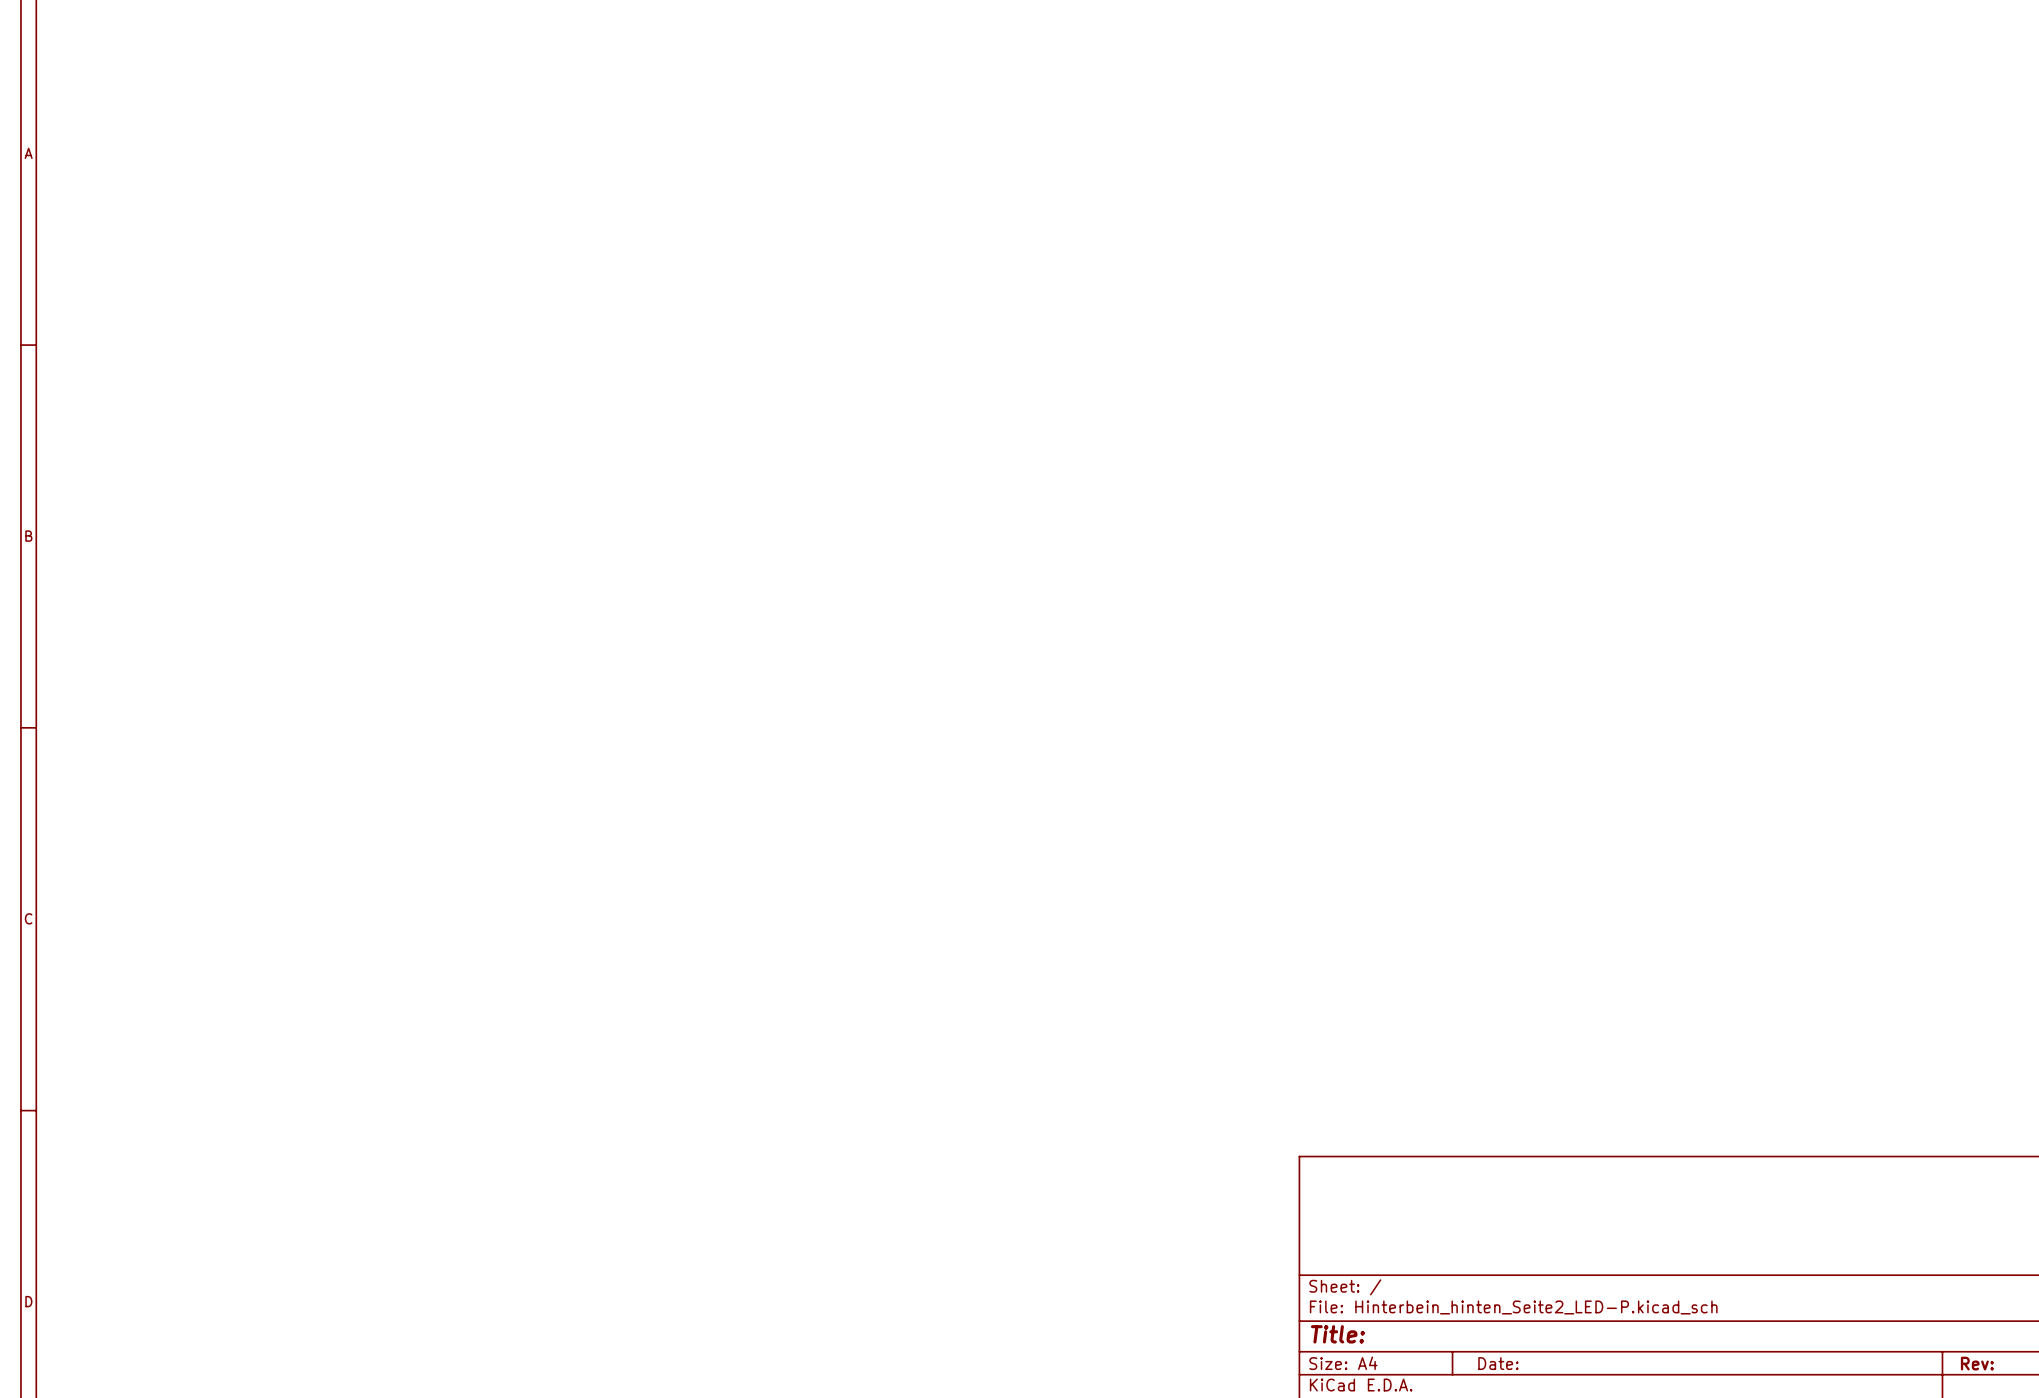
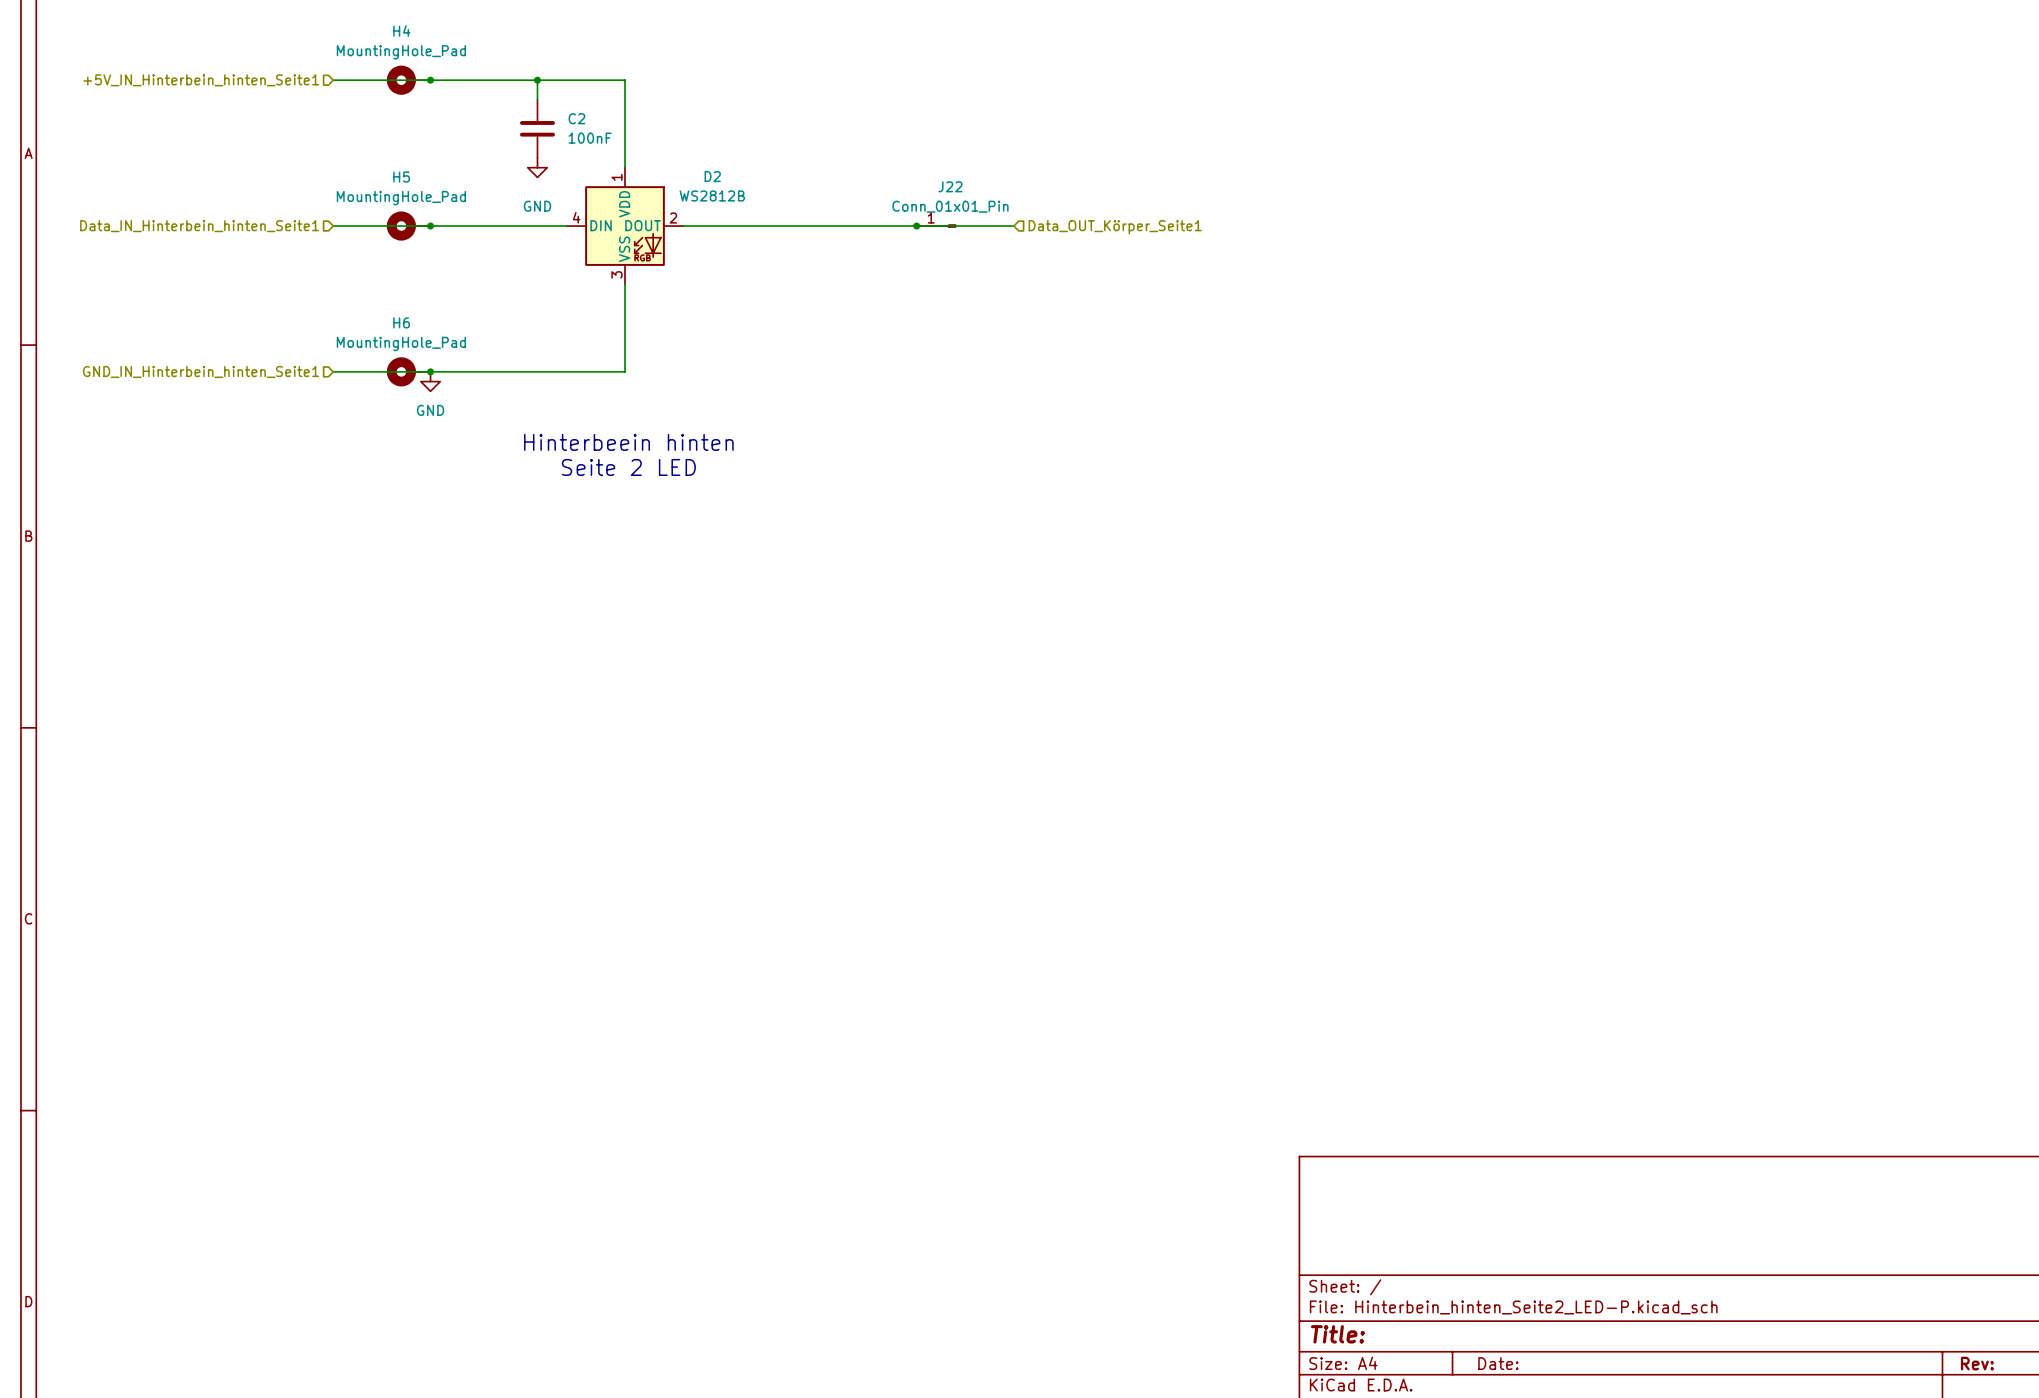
hierarchical label: none -> +5V_IN_Hinterbein_hinten_Seite1 (201, 80)
wire: none -> (333, 80) (624, 80) (624, 167)
H4: none -> MountingHole_Pad (408, 80)
junction: none -> (430, 80)
wire: none -> (537, 80) (537, 99)
junction: none -> (537, 80)
C2: none -> 100nF (537, 128)
power symbol: none -> GND (537, 167)
hierarchical label: none -> Data_IN_Hinterbein_hinten_Seite1 (199, 226)
wire: none -> (333, 226) (566, 226)
H5: none -> MountingHole_Pad (408, 226)
junction: none -> (430, 226)
D2: none -> WS2812B (624, 226)
wire: none -> (683, 226) (1013, 226)
junction: none -> (916, 226)
J22: none -> Conn_01x01_Pin (936, 226)
hierarchical label: none -> Data_OUT_Körper_Seite1 (1115, 227)
wire: none -> (624, 284) (624, 371) (333, 371)
hierarchical label: none -> GND_IN_Hinterbein_hinten_Seite1 (200, 371)
H6: none -> MountingHole_Pad (408, 371)
junction: none -> (430, 371)
power symbol: none -> GND (430, 381)
text: none -> Hinterbeein hinten (628, 442)
text: none -> Seite 2 LED (628, 467)

